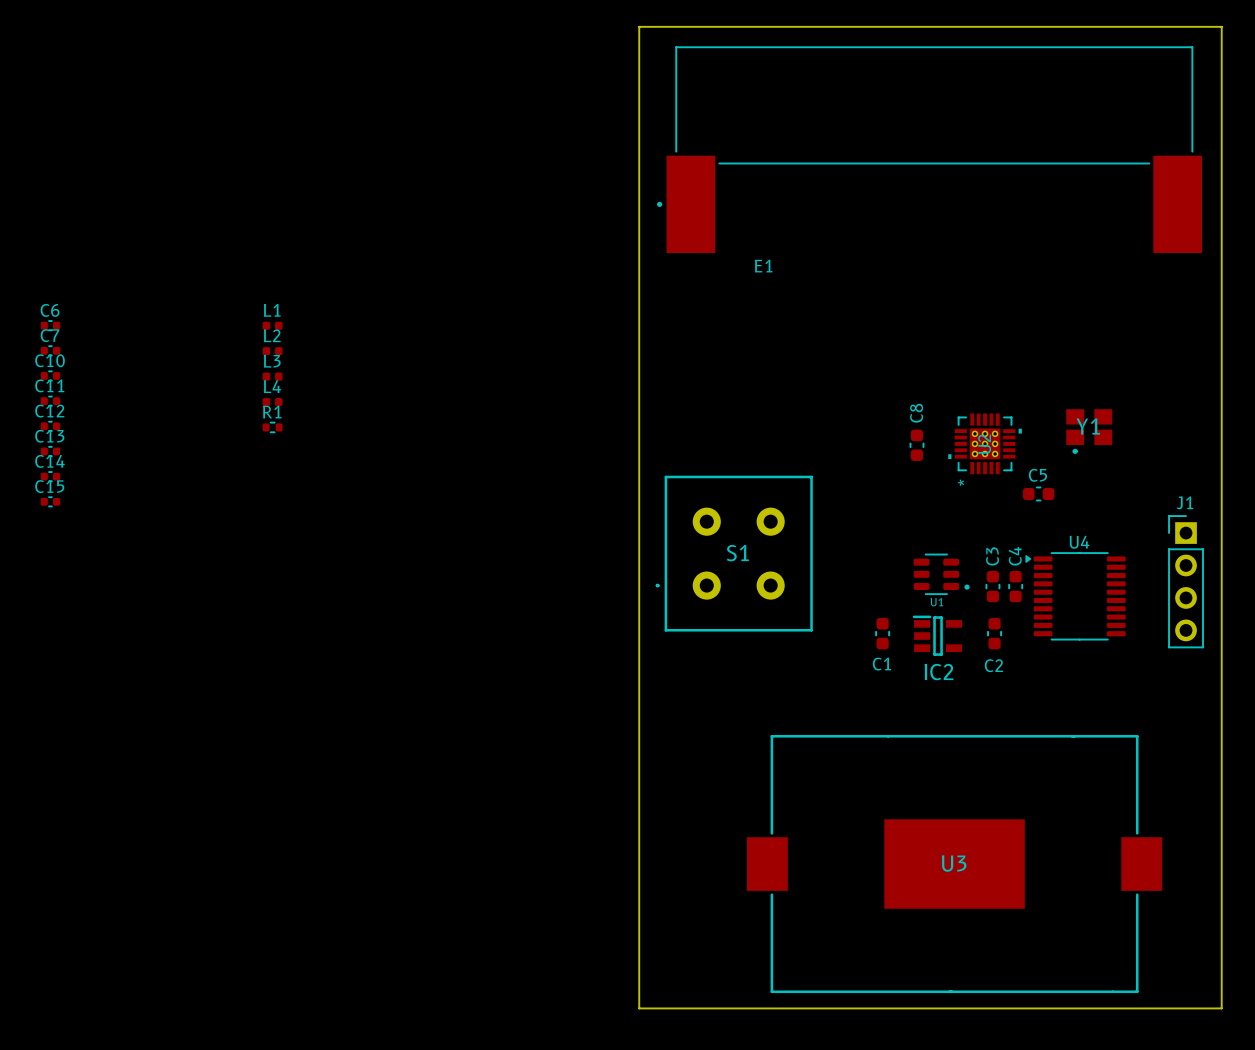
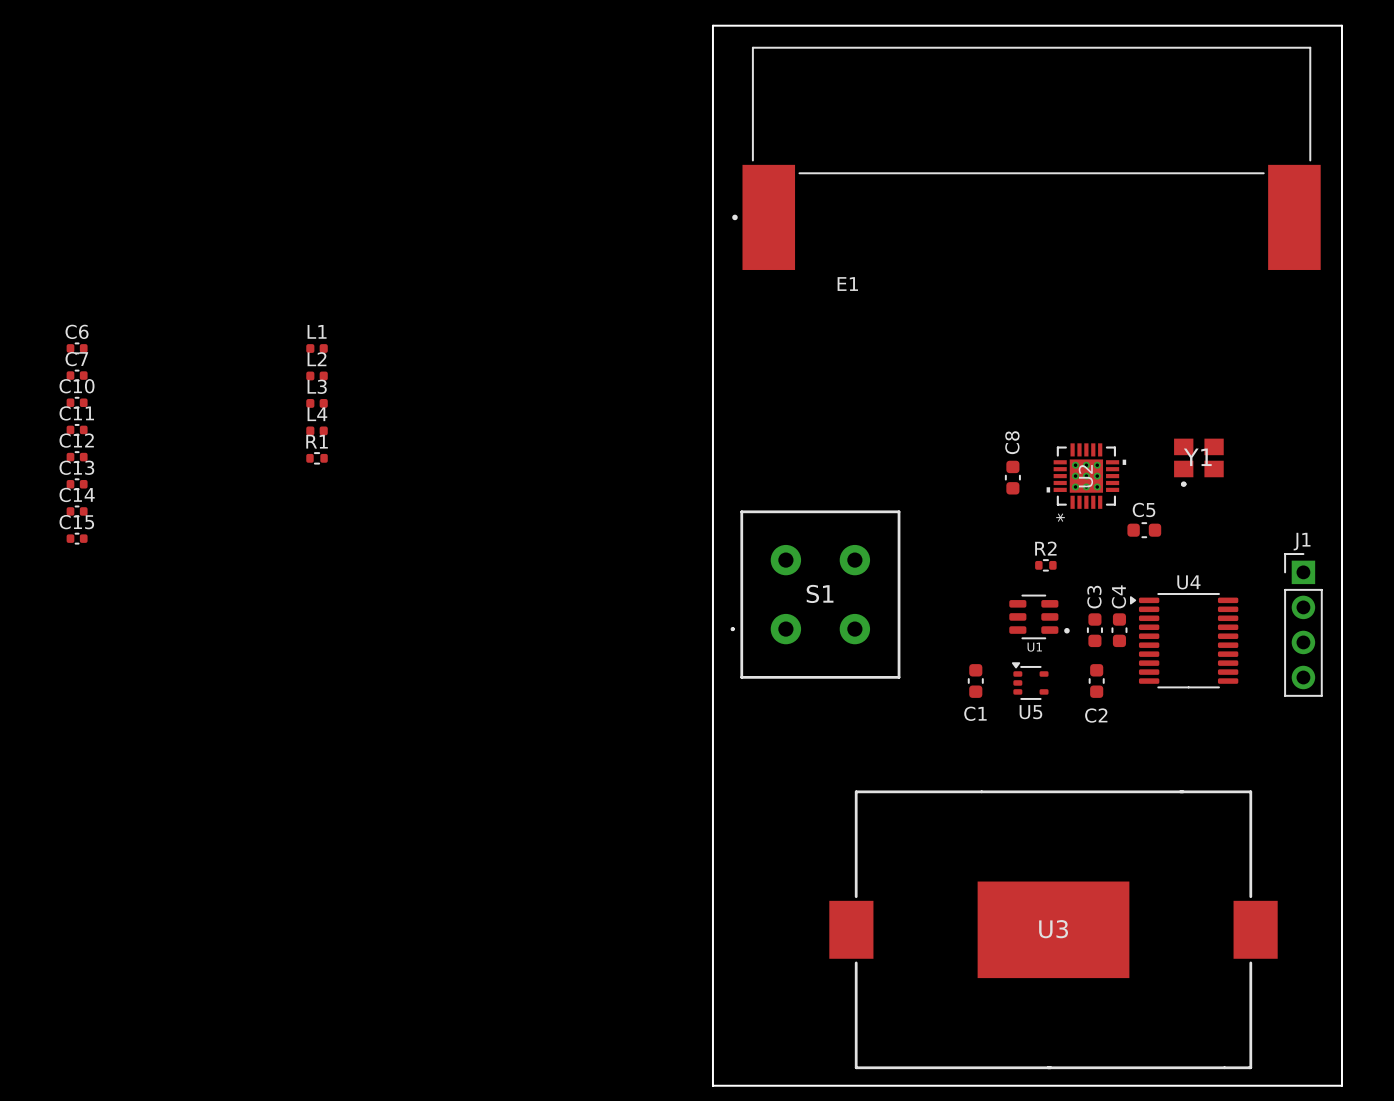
R2: none -> (1045, 565)
U5: none -> (1030, 681)
IC2: (937, 635) -> none

